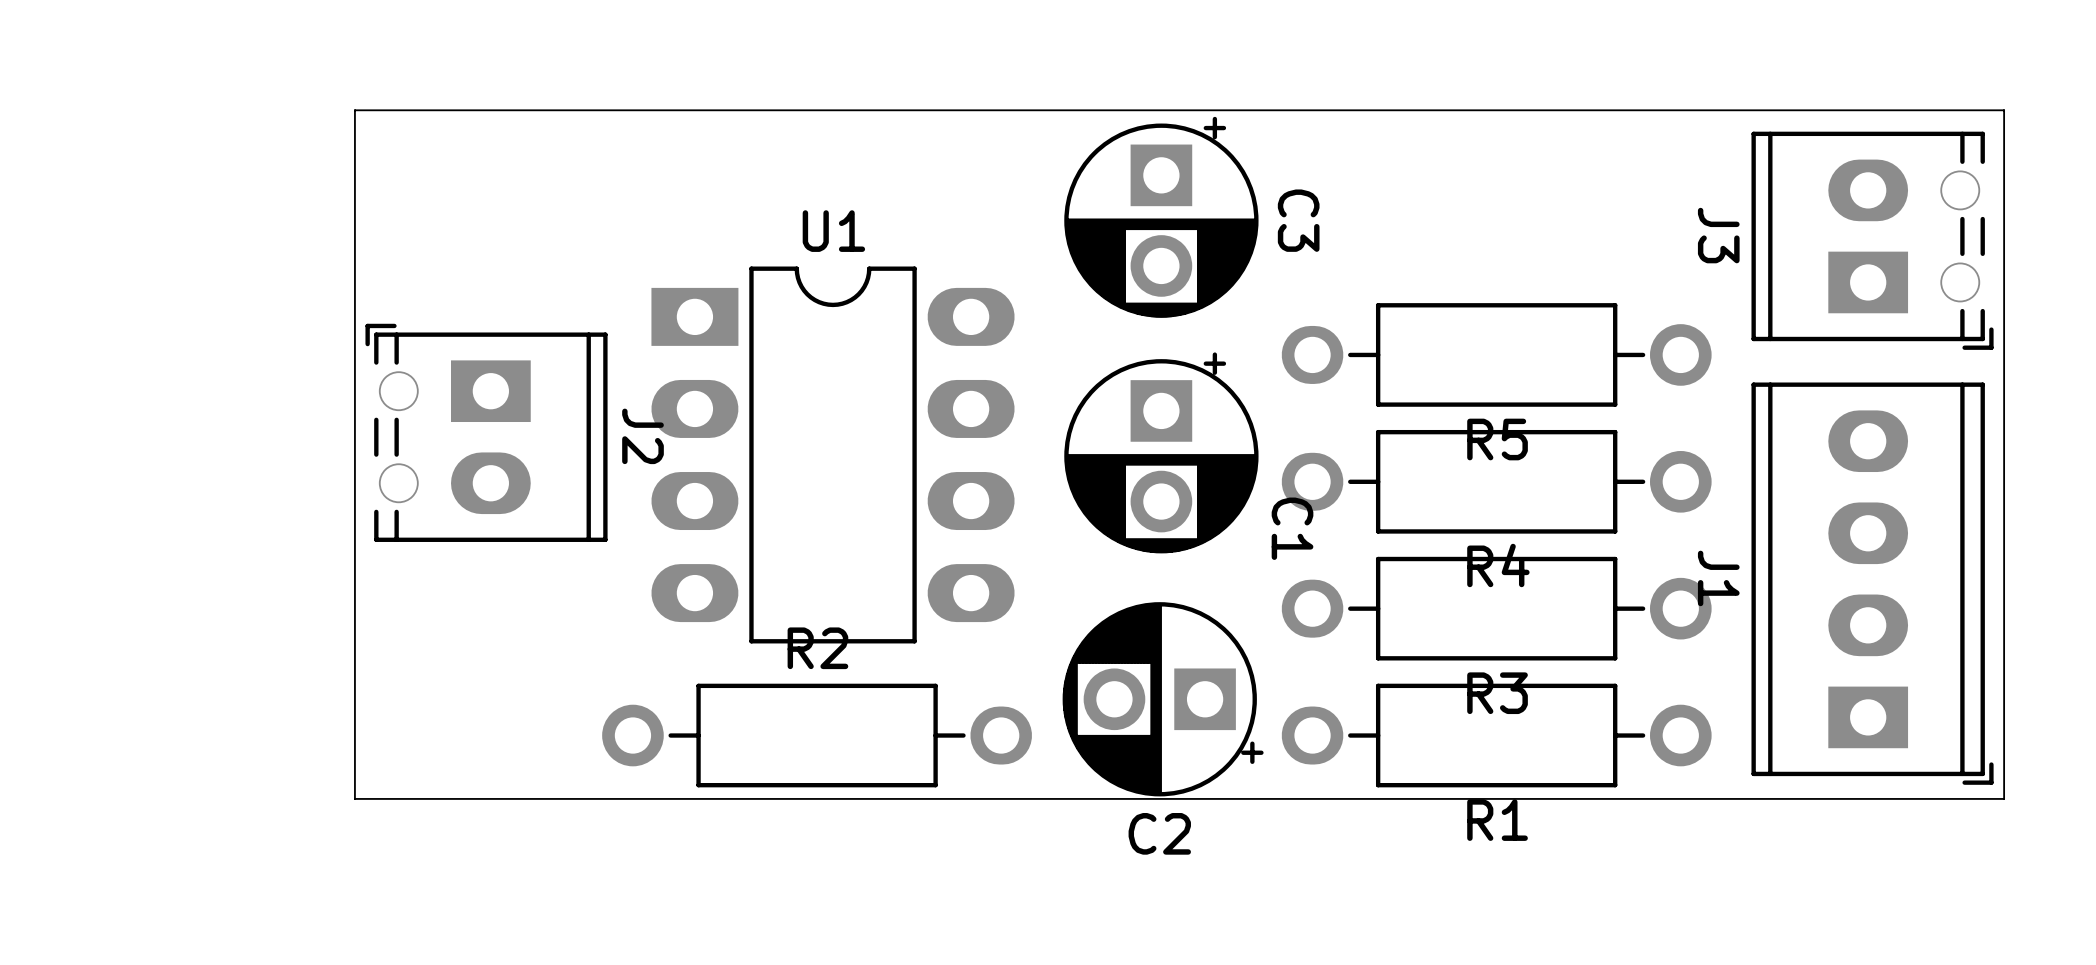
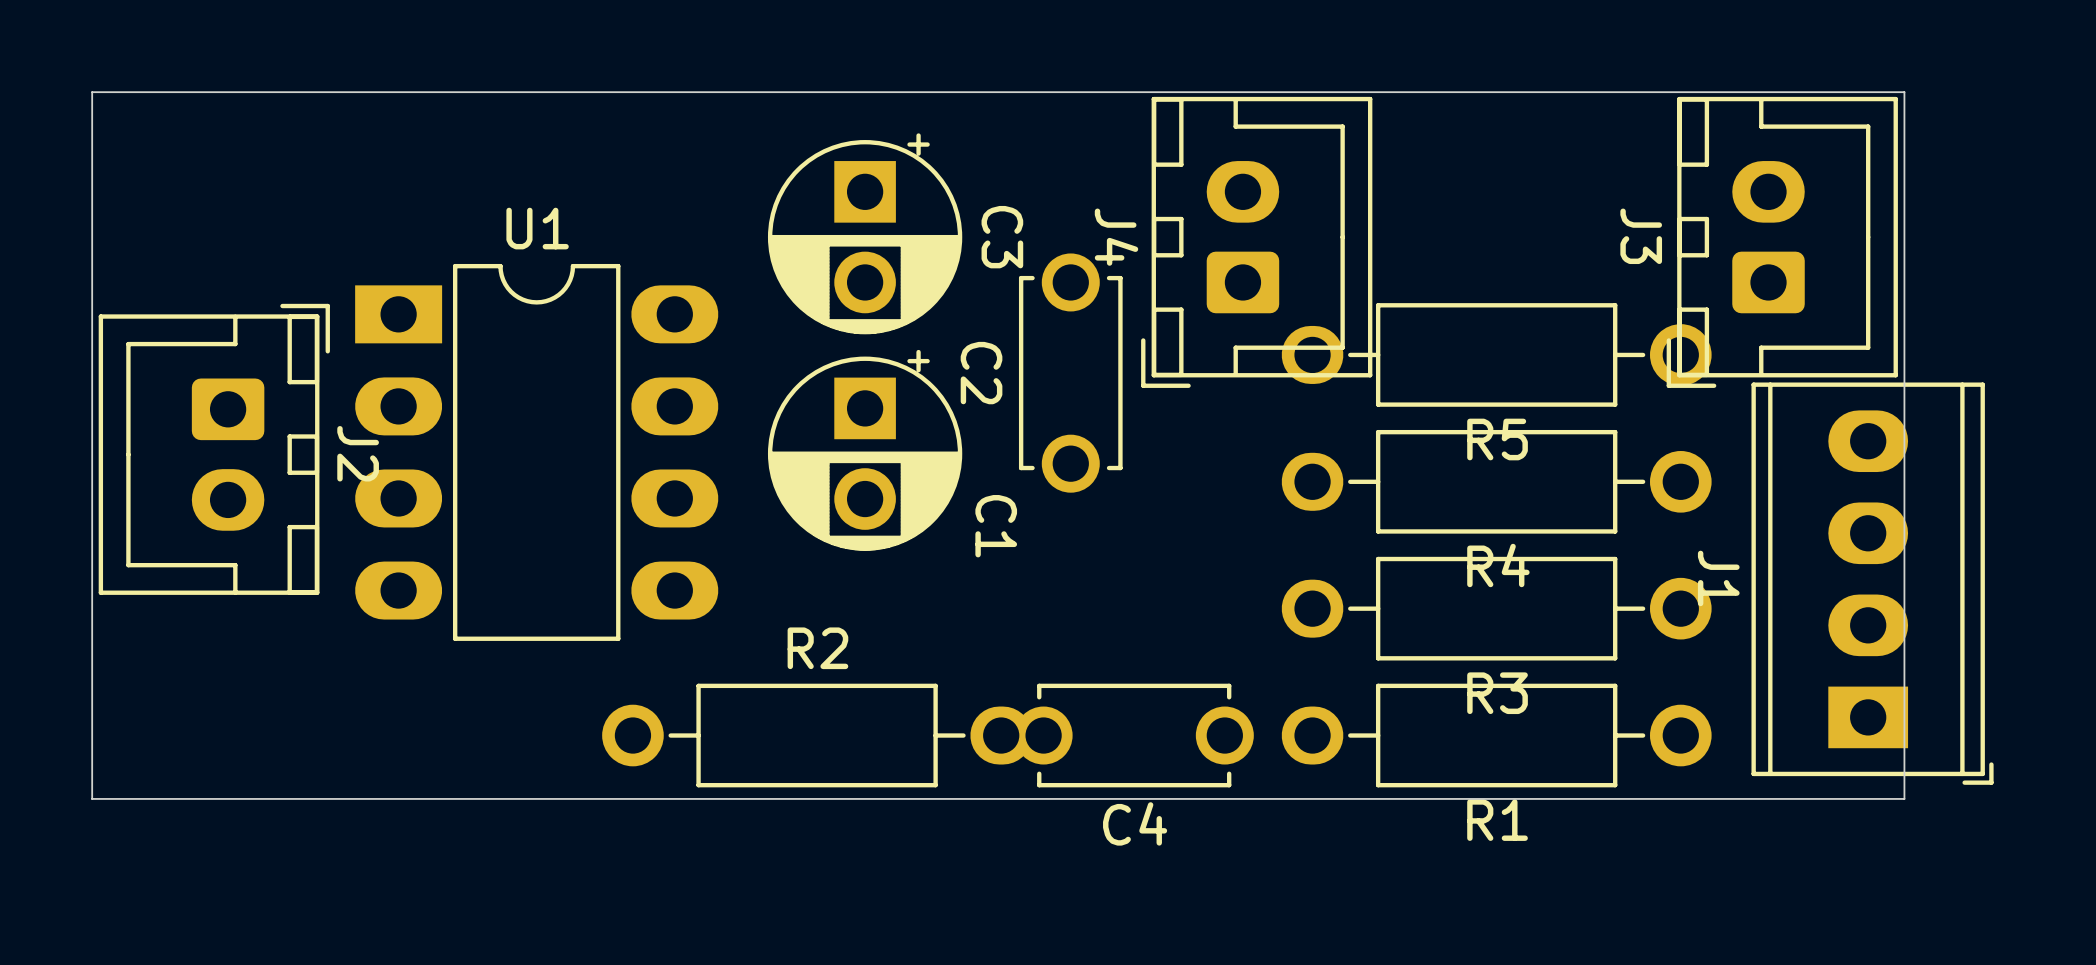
J3 footprint: [1751, 131, 1994, 350] -> [1666, 96, 1898, 388]
C3 position: (1161, 217) -> (865, 233)
J4: none -> (1256, 242)
J2 footprint: [365, 323, 608, 542] -> [98, 303, 330, 595]
C1 position: (1161, 452) -> (865, 450)
U1 position: (833, 454) -> (536, 452)
C2 footprint: [1062, 602, 1264, 797] -> [1018, 253, 1123, 493]
C4: none -> (1134, 735)
board edge: (1904, 798) (2004, 798) (2004, 110) (354, 110) (354, 798) -> (1904, 798) (1904, 92) (92, 92) (92, 798) (354, 798)
C2 name position: C2 (1159, 833) -> C2 (981, 373)

